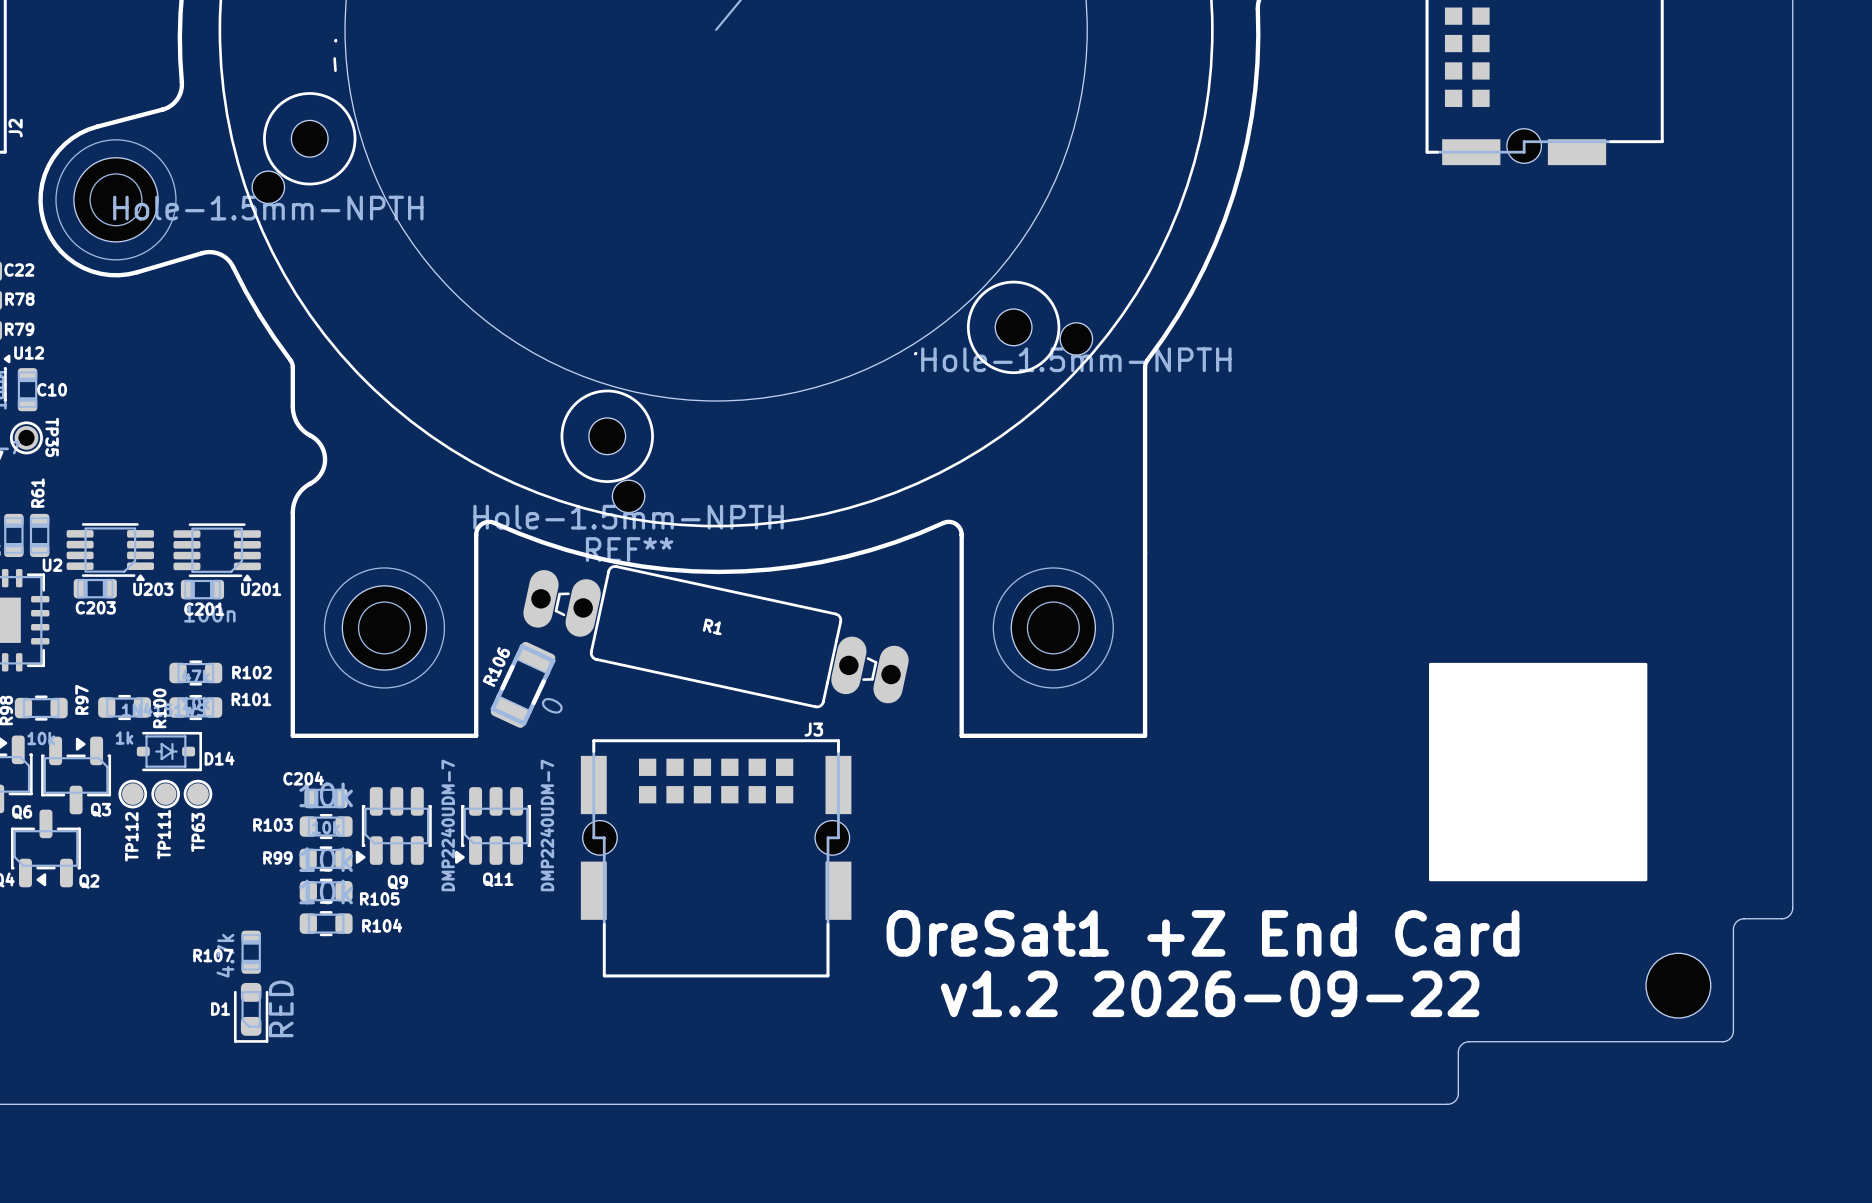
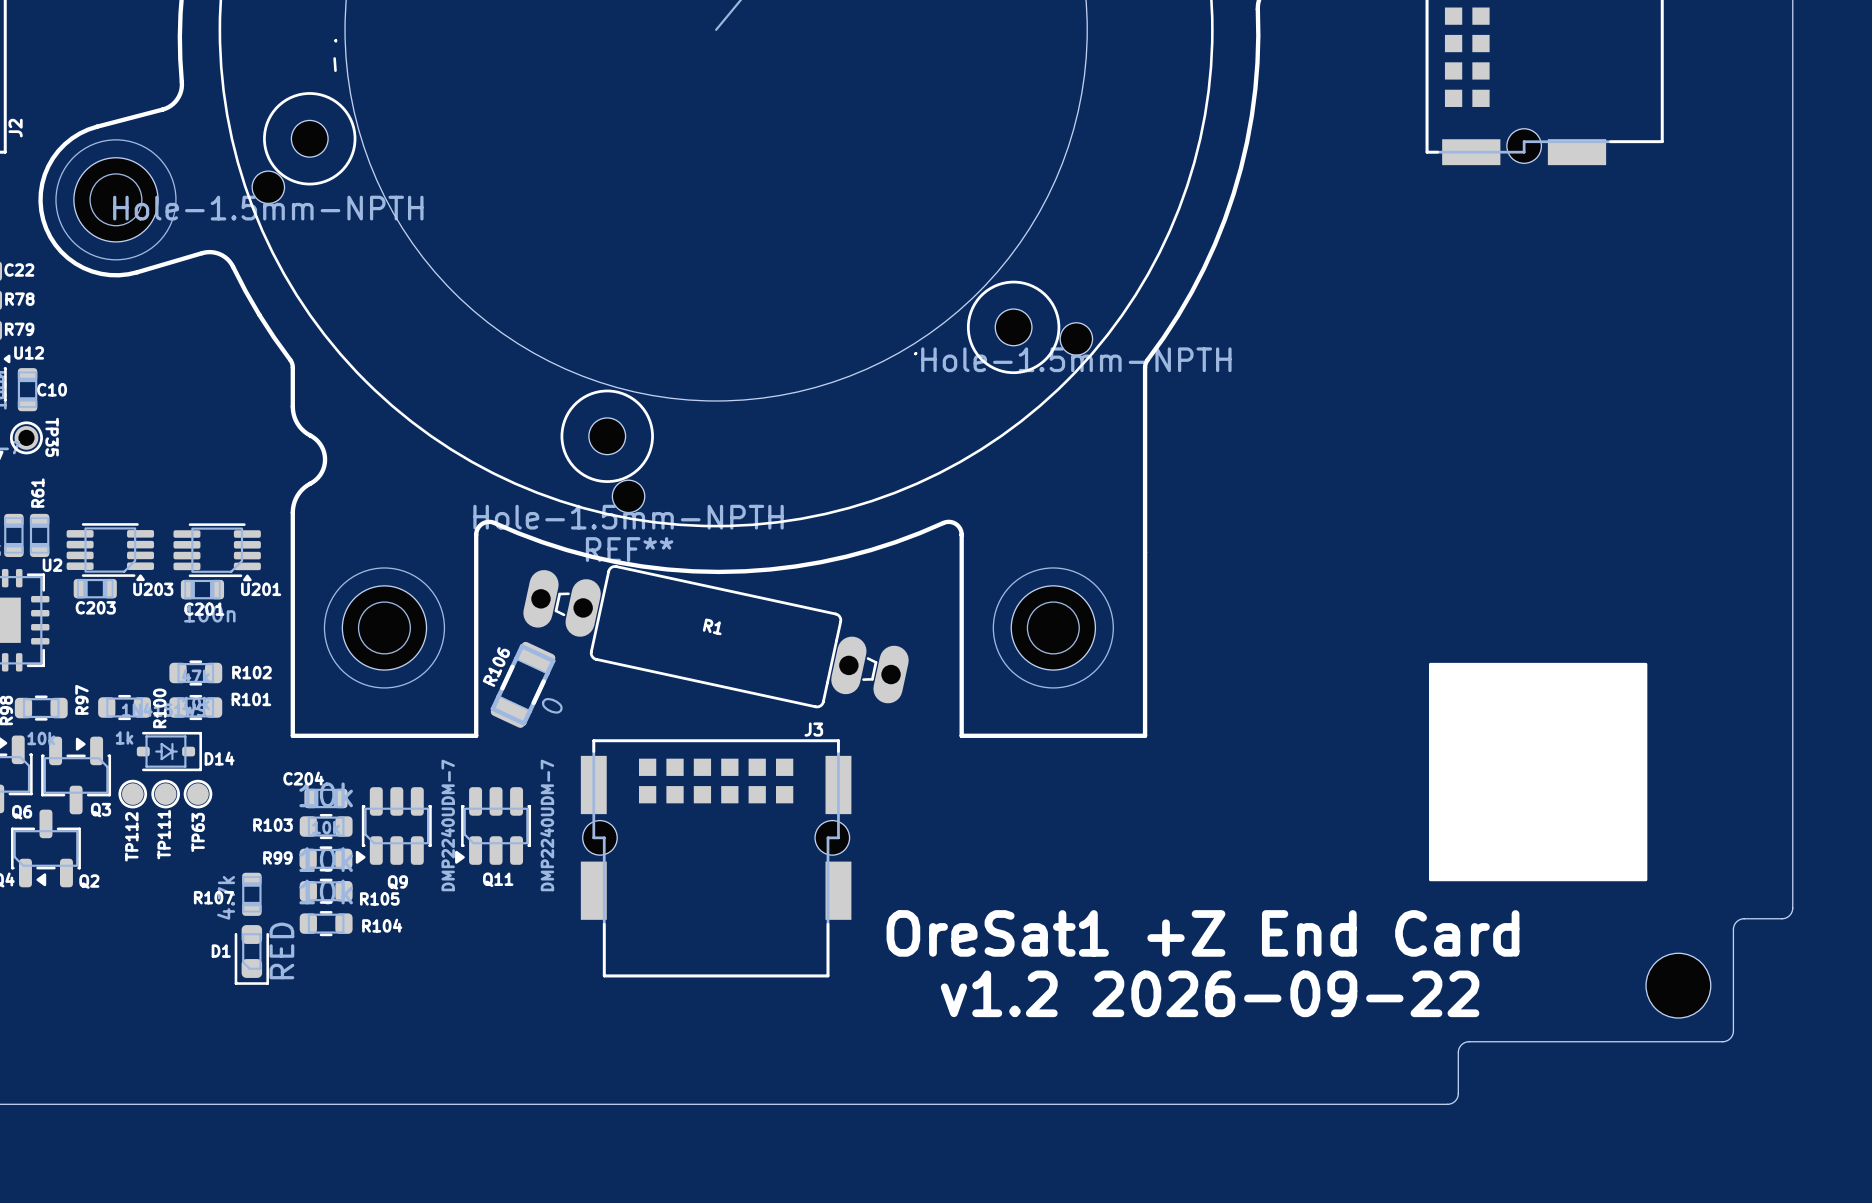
R107 position: (251, 952) -> (251, 894)
D1 position: (251, 1012) -> (251, 954)

